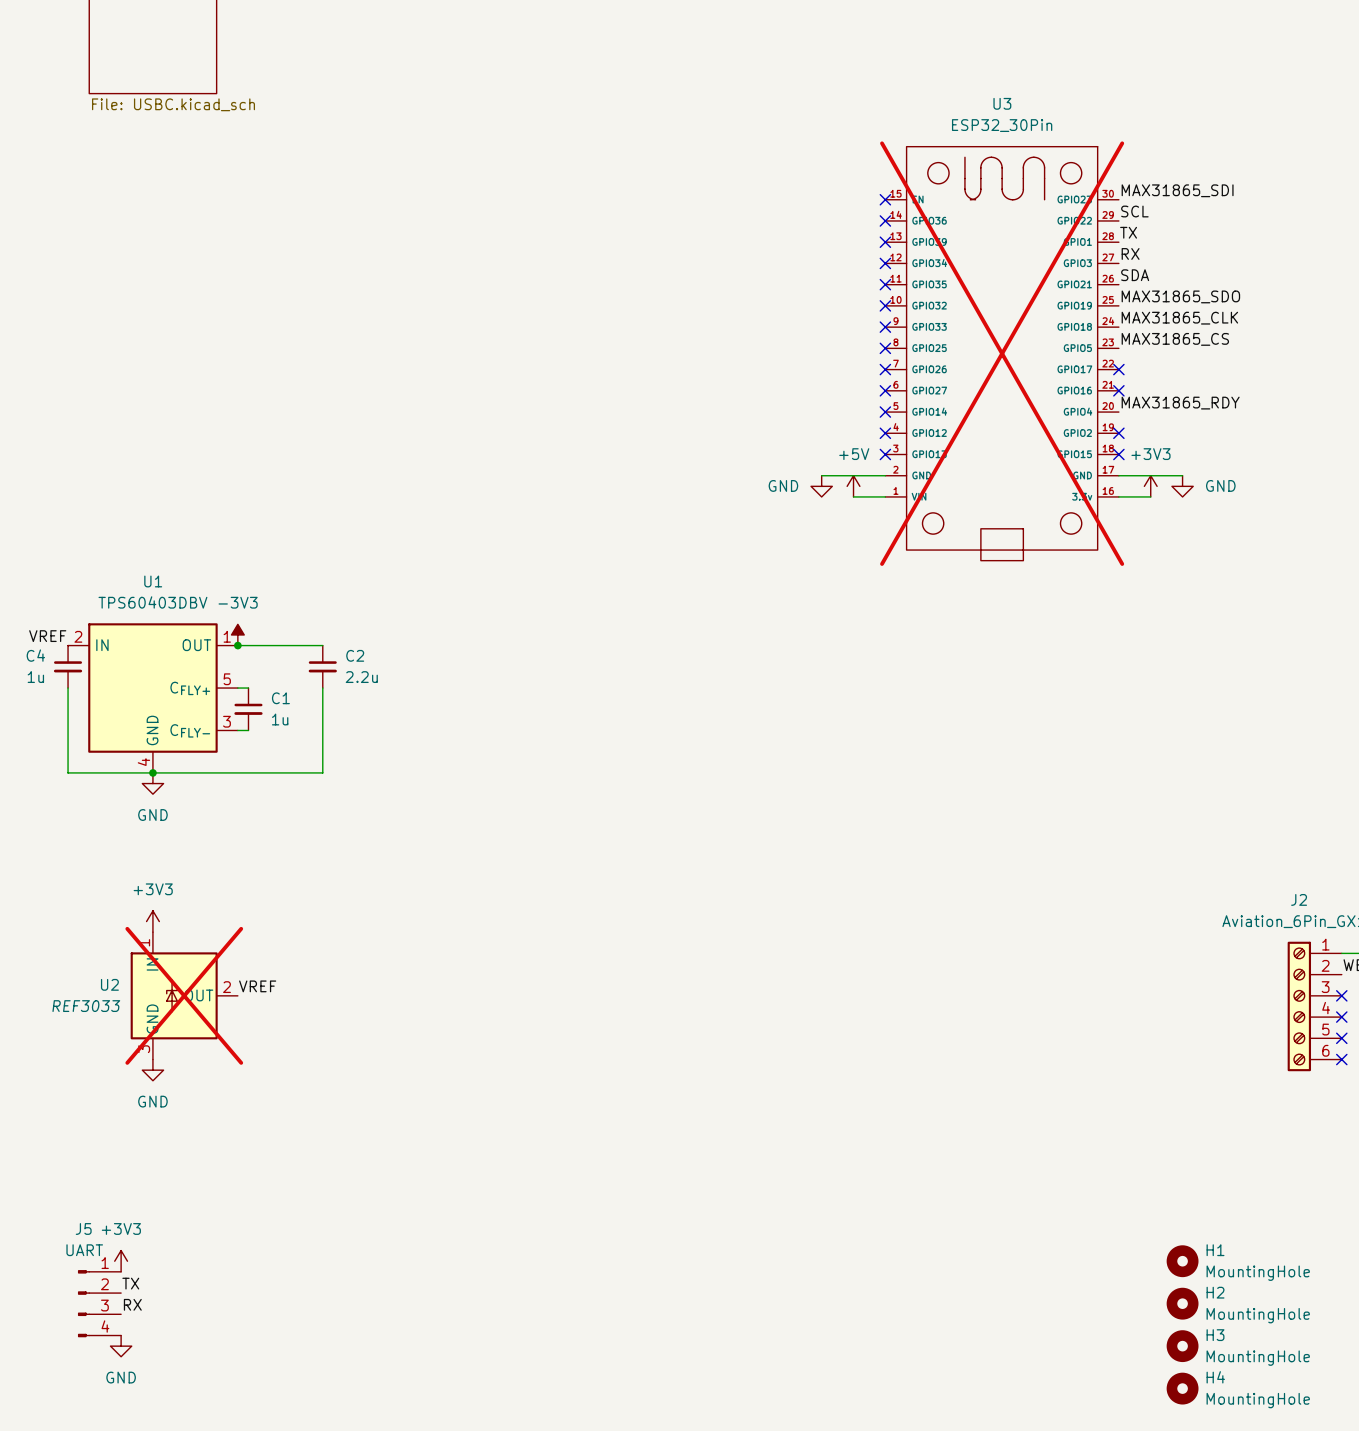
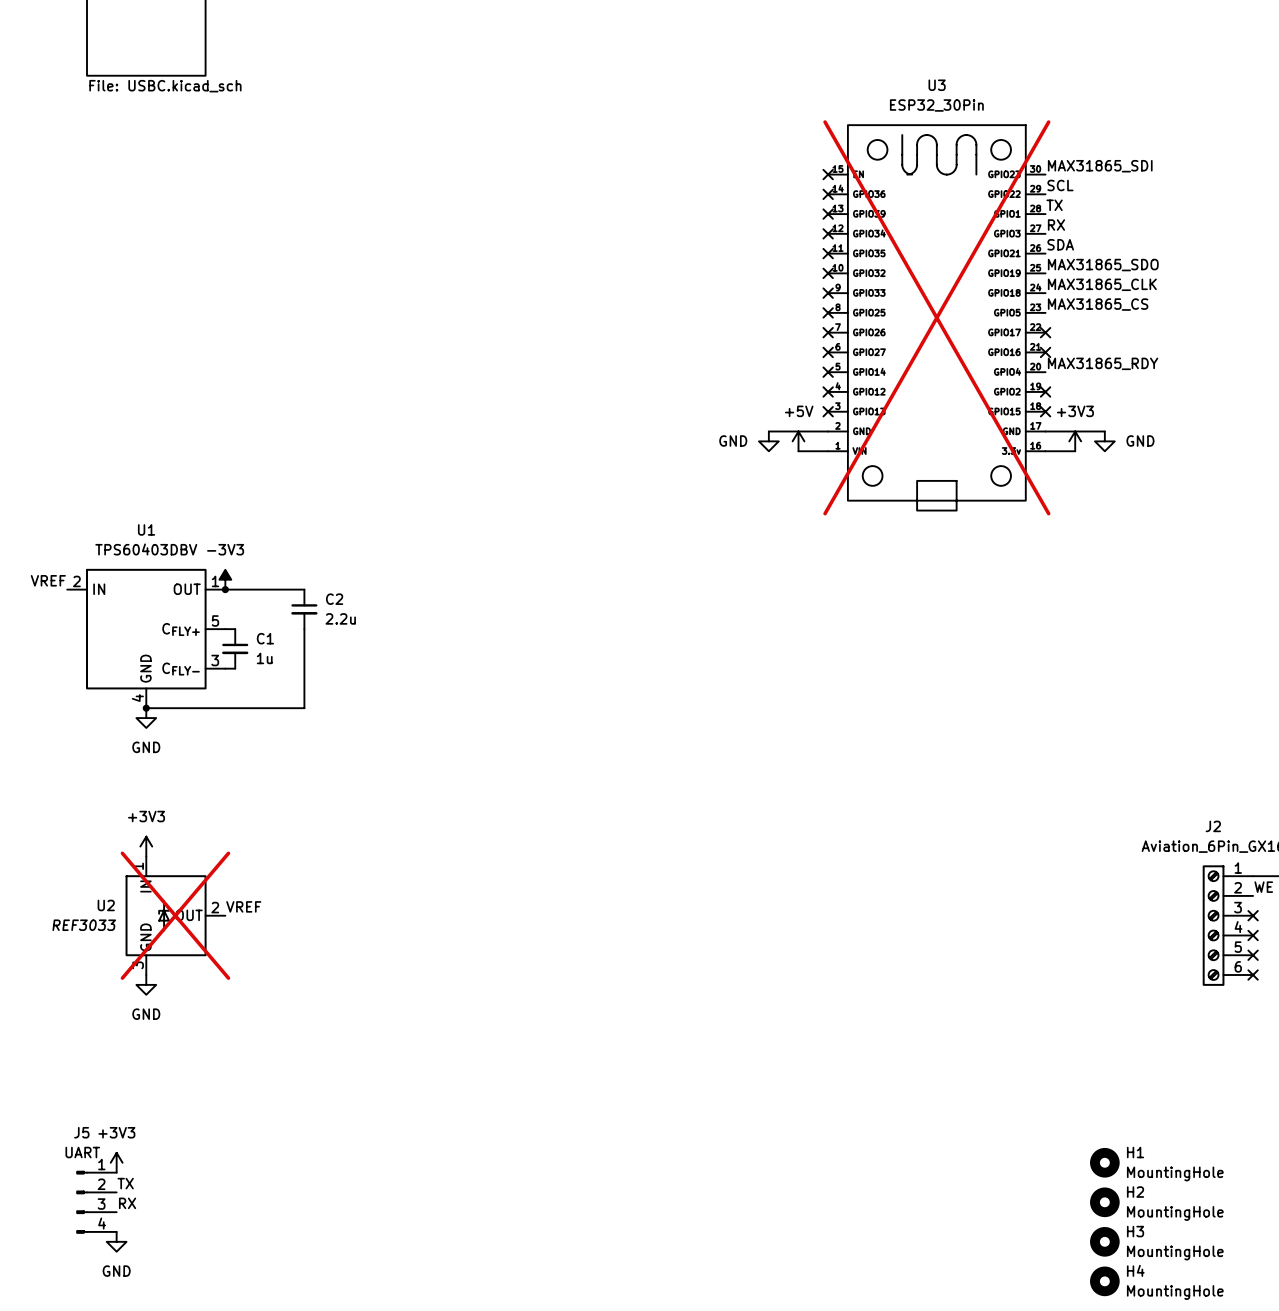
C4: 1u (68, 666) -> none
wire: (68, 688) (68, 772) (152, 772) -> none

